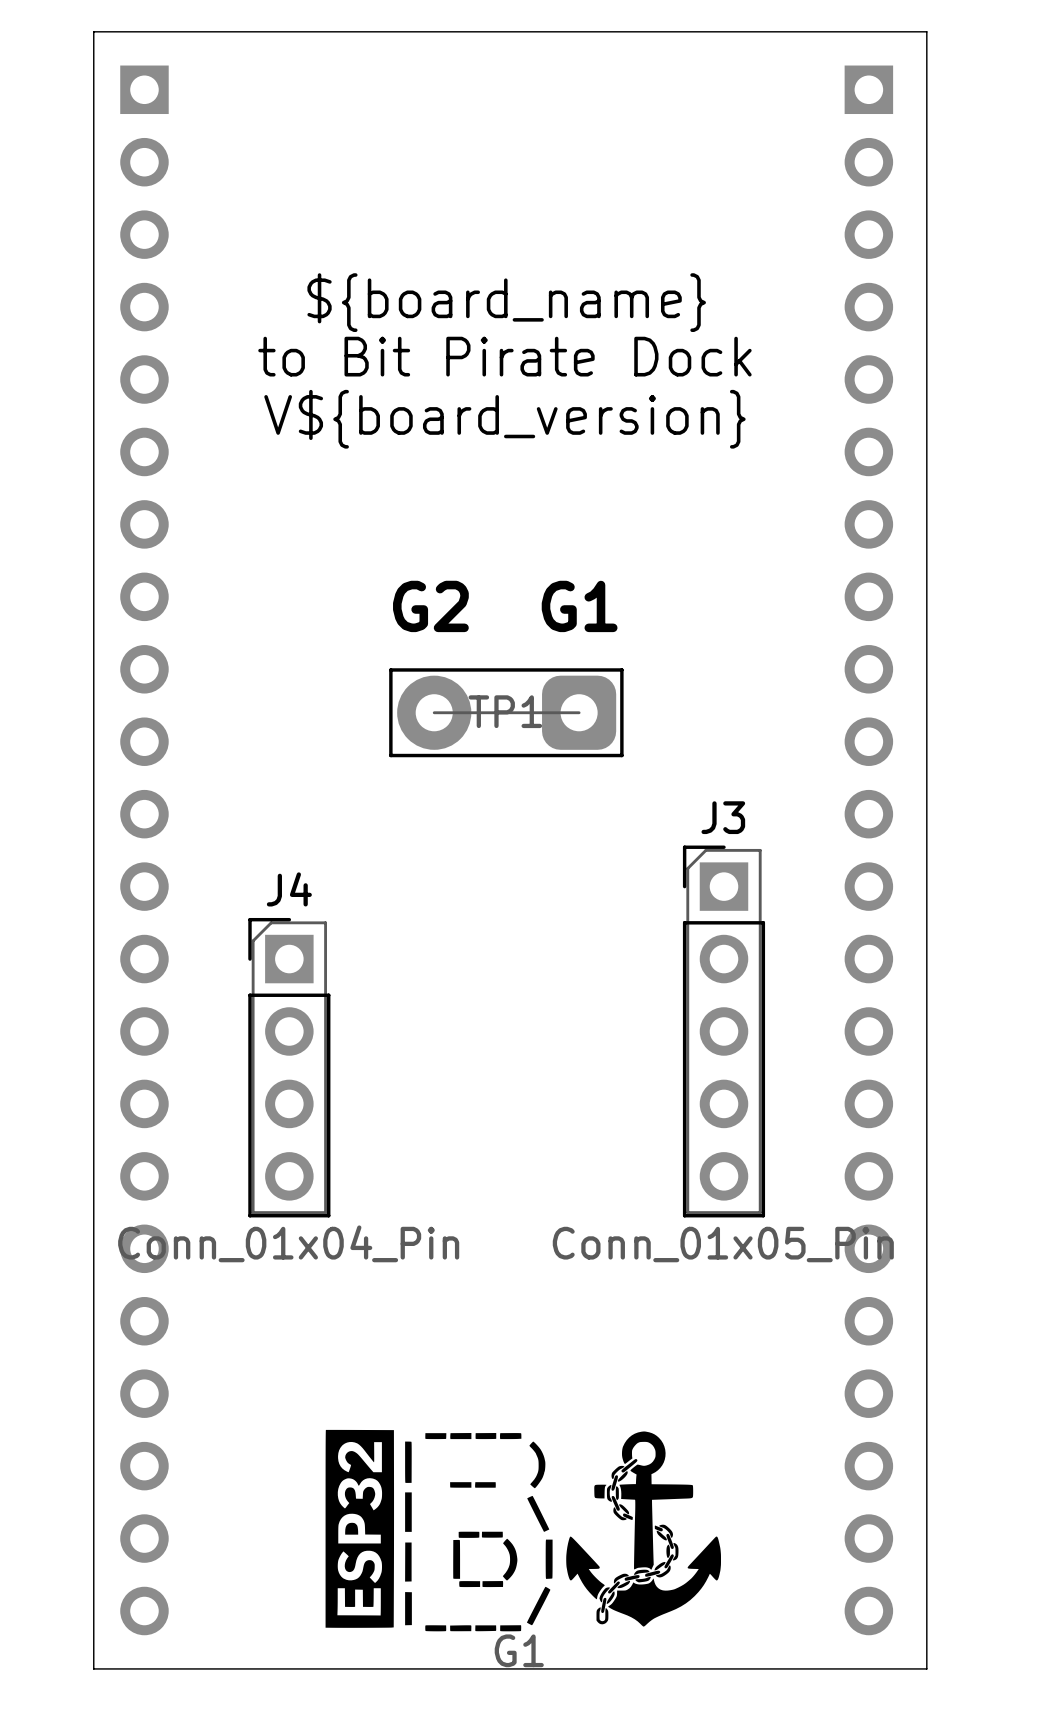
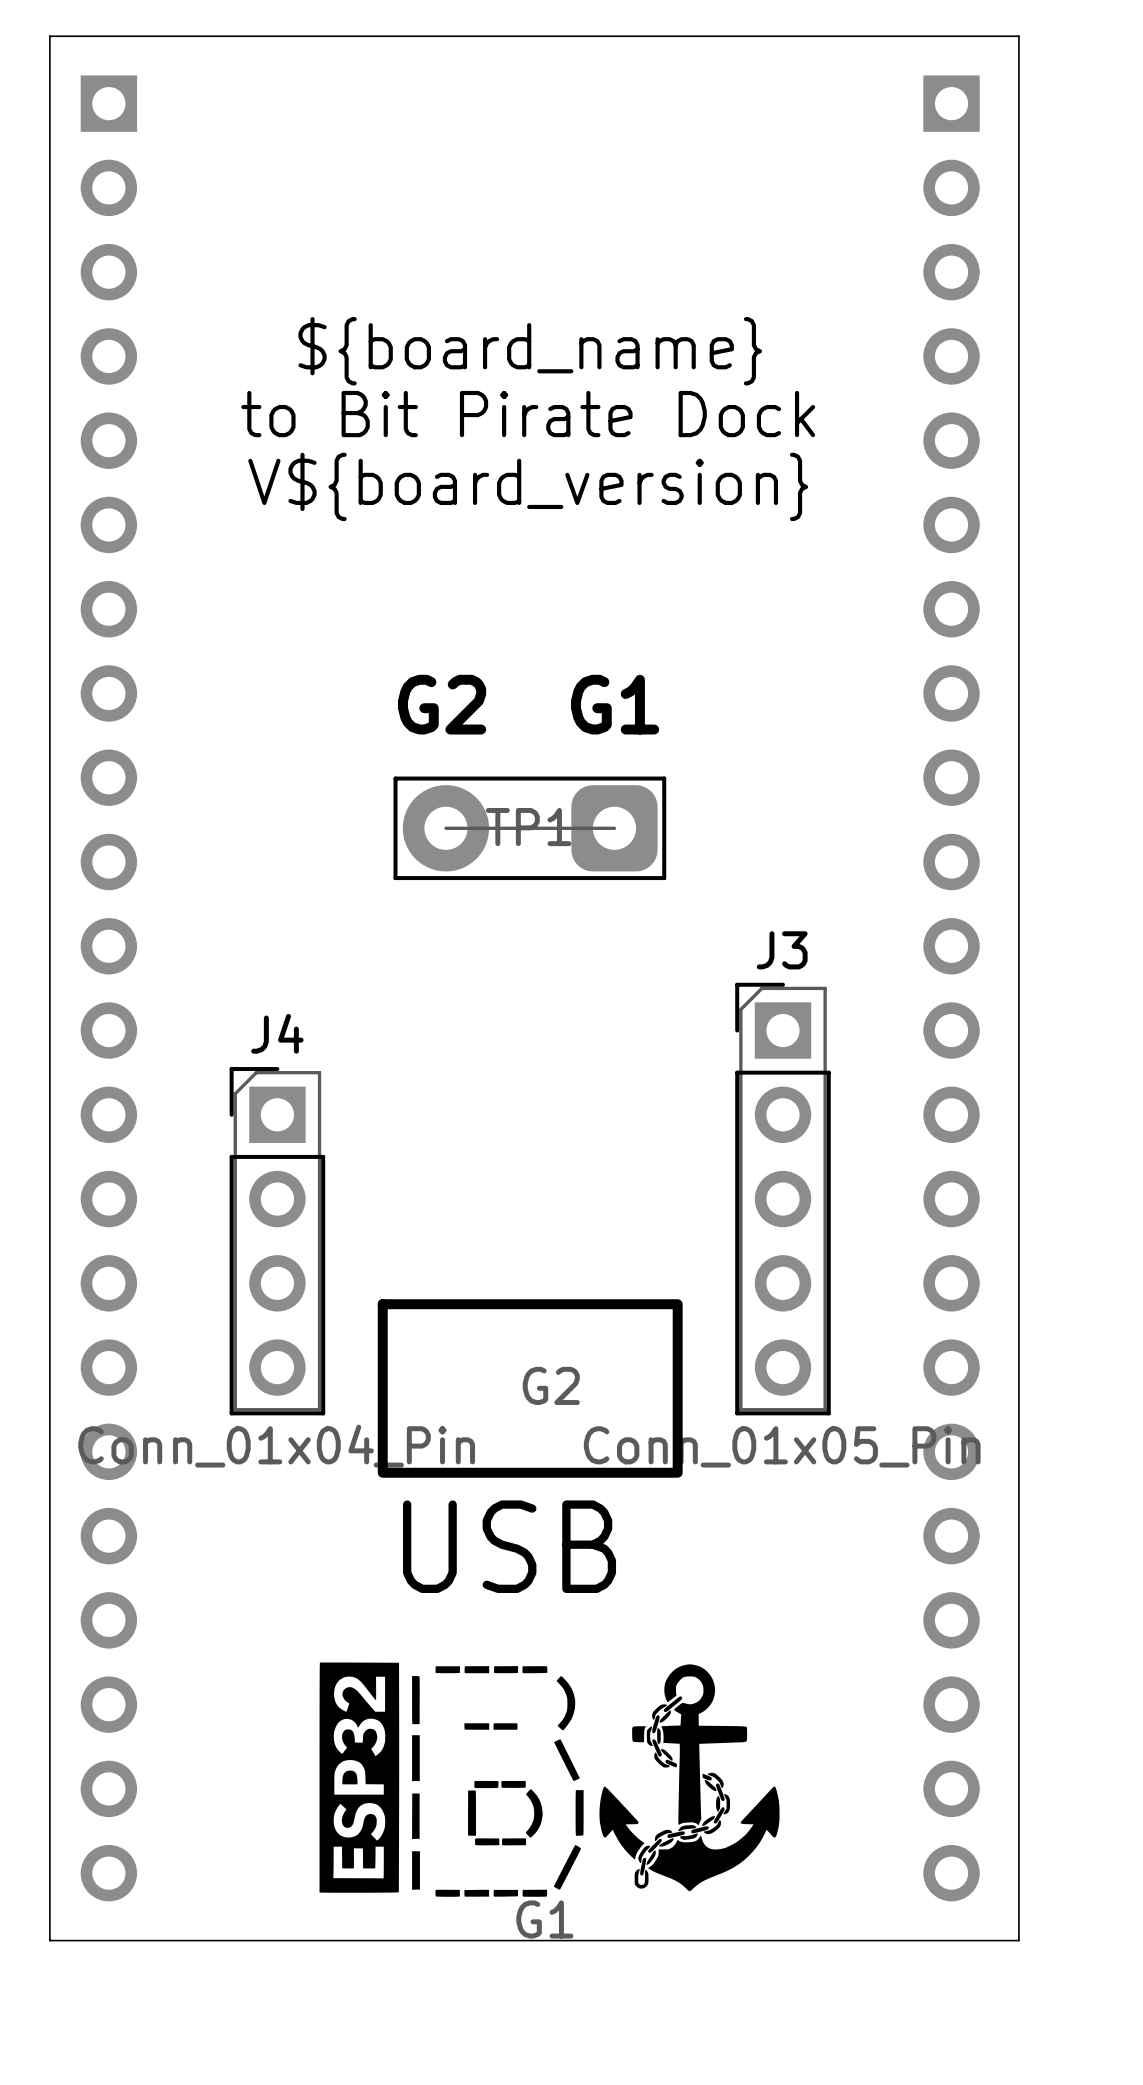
G2: none -> (530, 1388)

